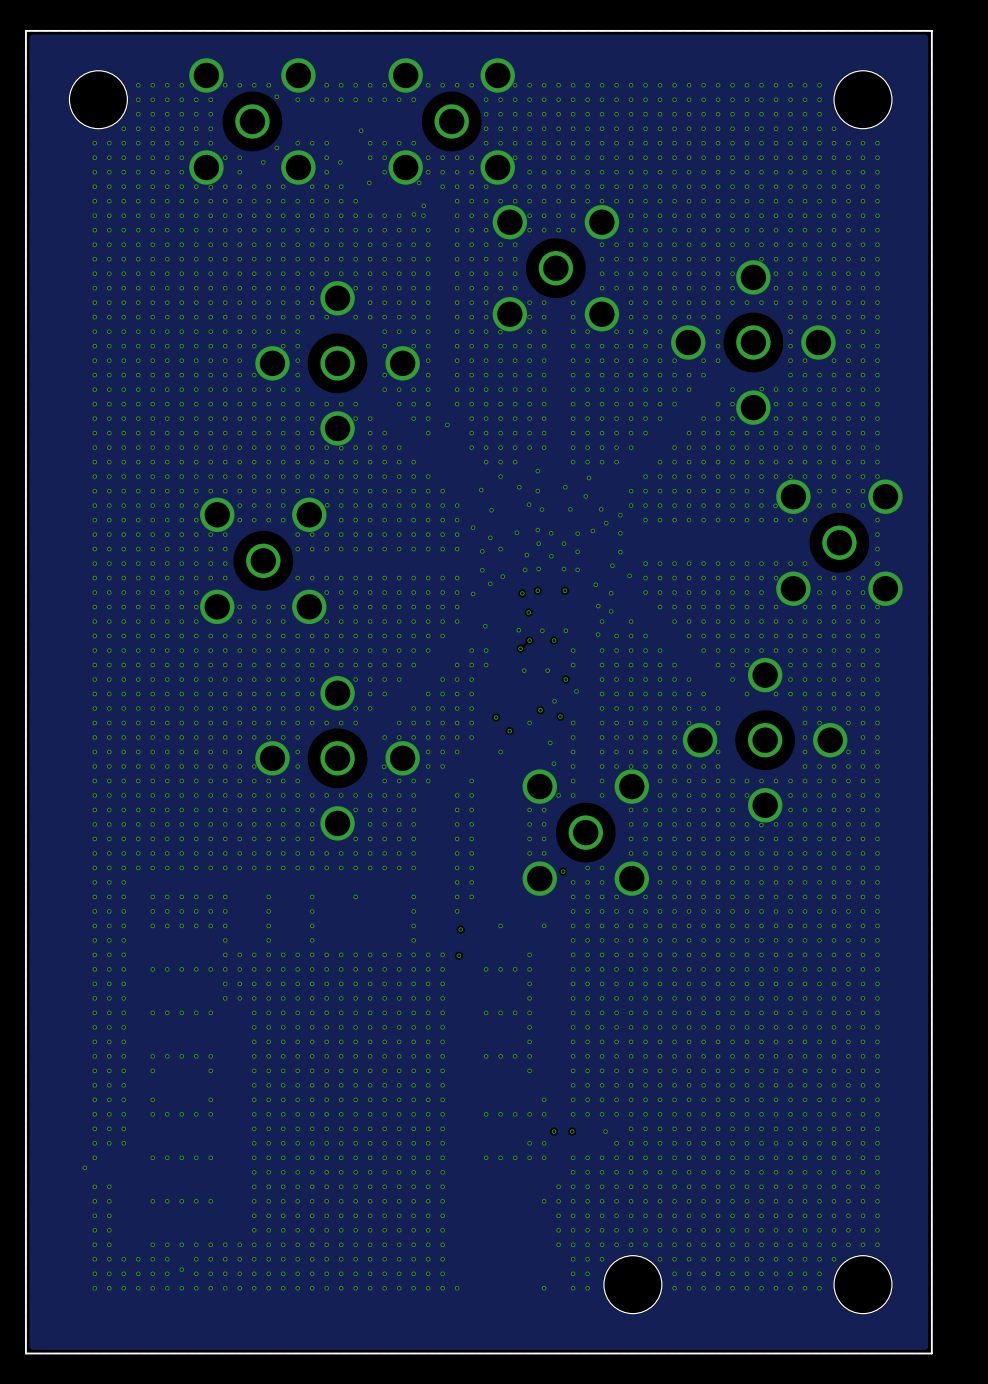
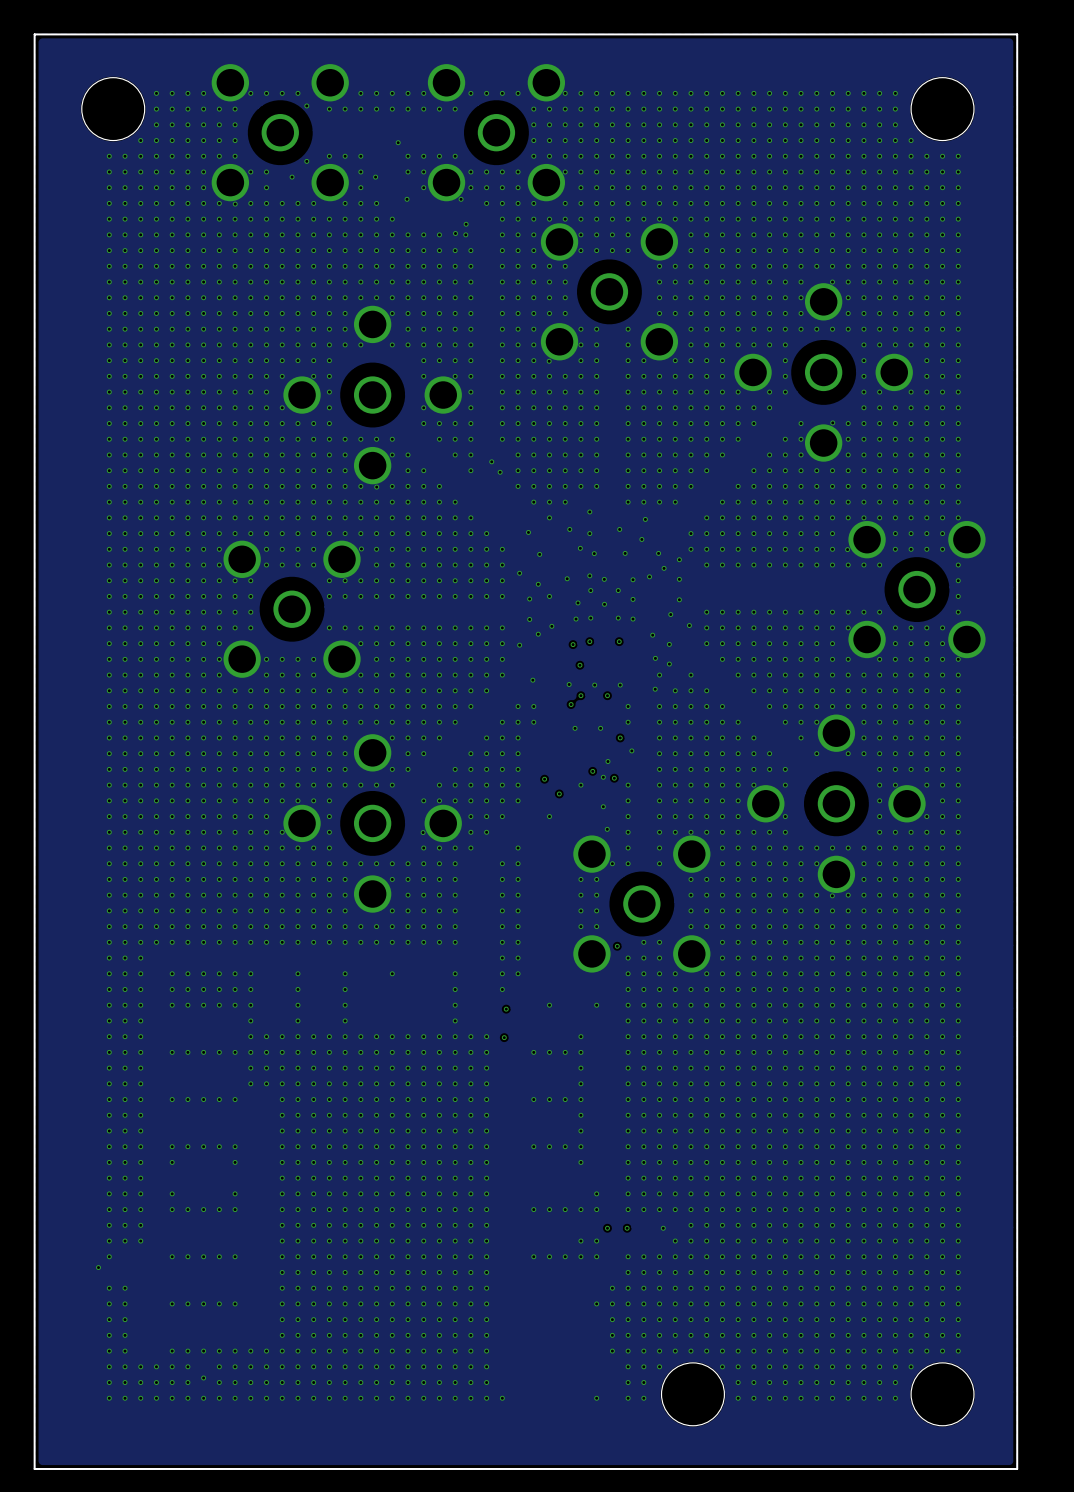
via: none -> (500, 472)
via: none -> (603, 777)

